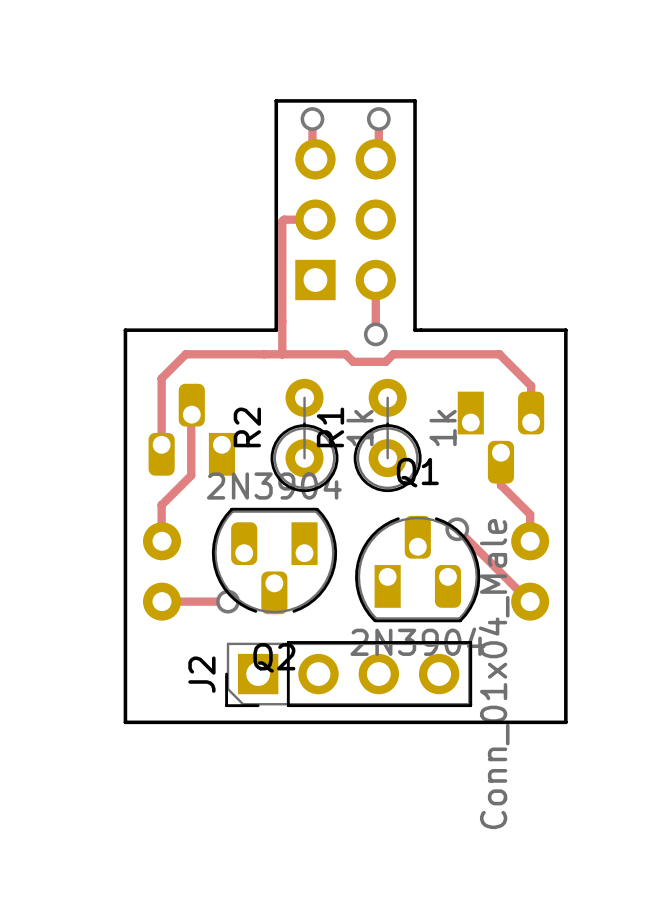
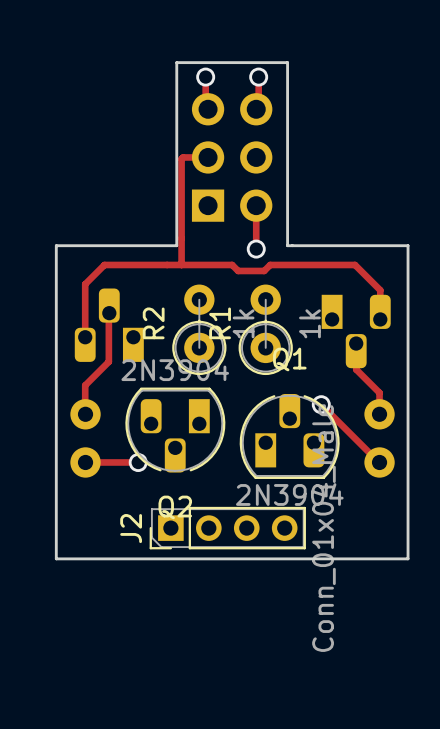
J2 footprint: [225, 641, 473, 708] -> [149, 506, 306, 550]

